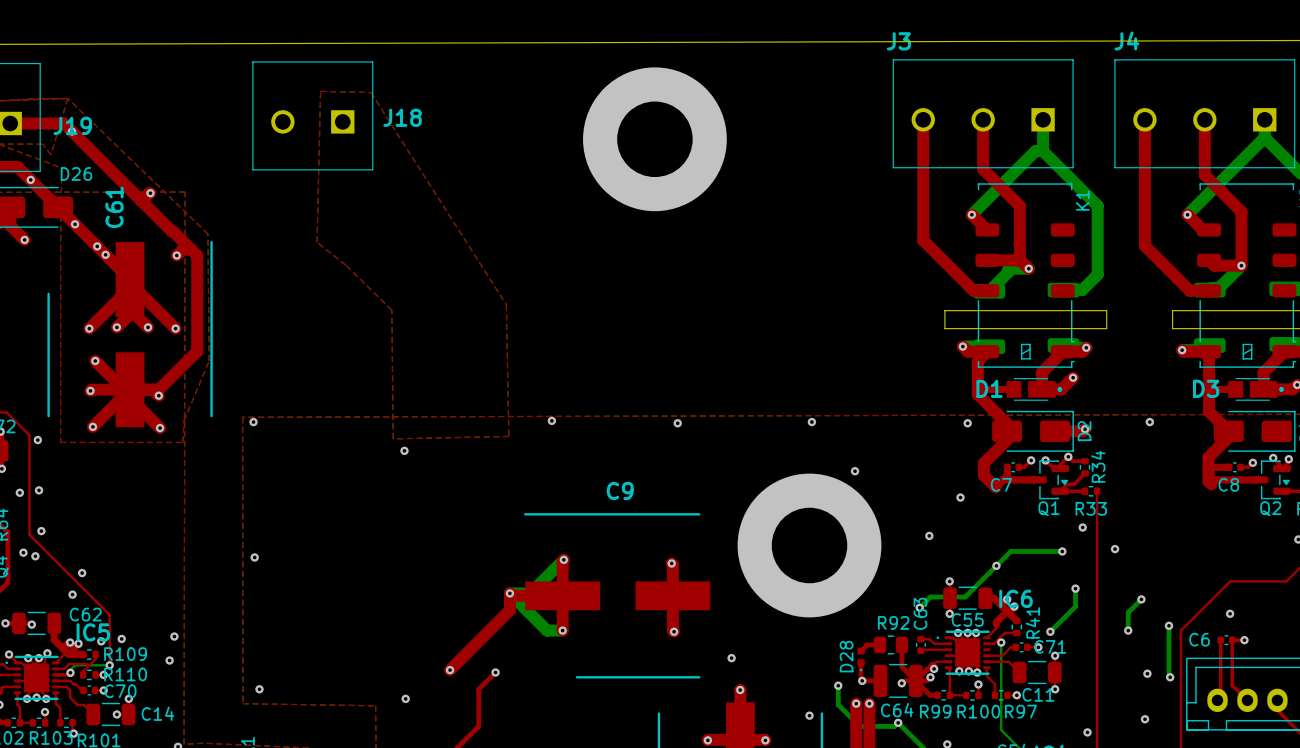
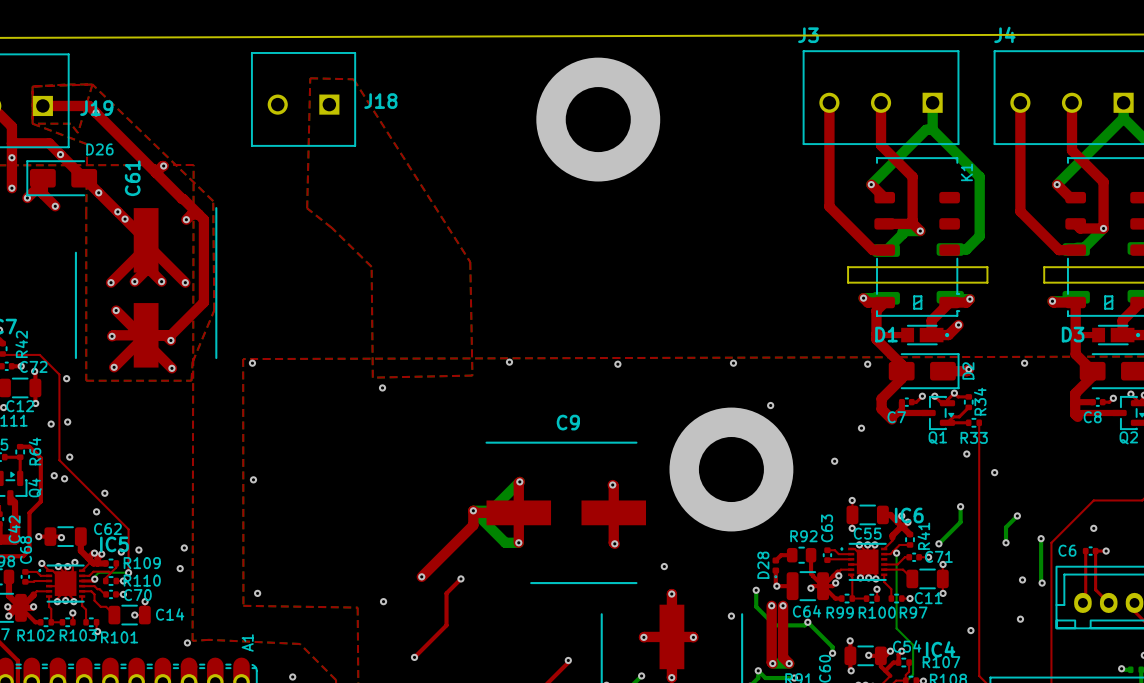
bottom track: (1062, 551) (1010, 551) (965, 597) (930, 597) (919, 607) -> none
via: (1062, 551) -> none
via: (996, 565) -> none
via: (919, 607) -> none

